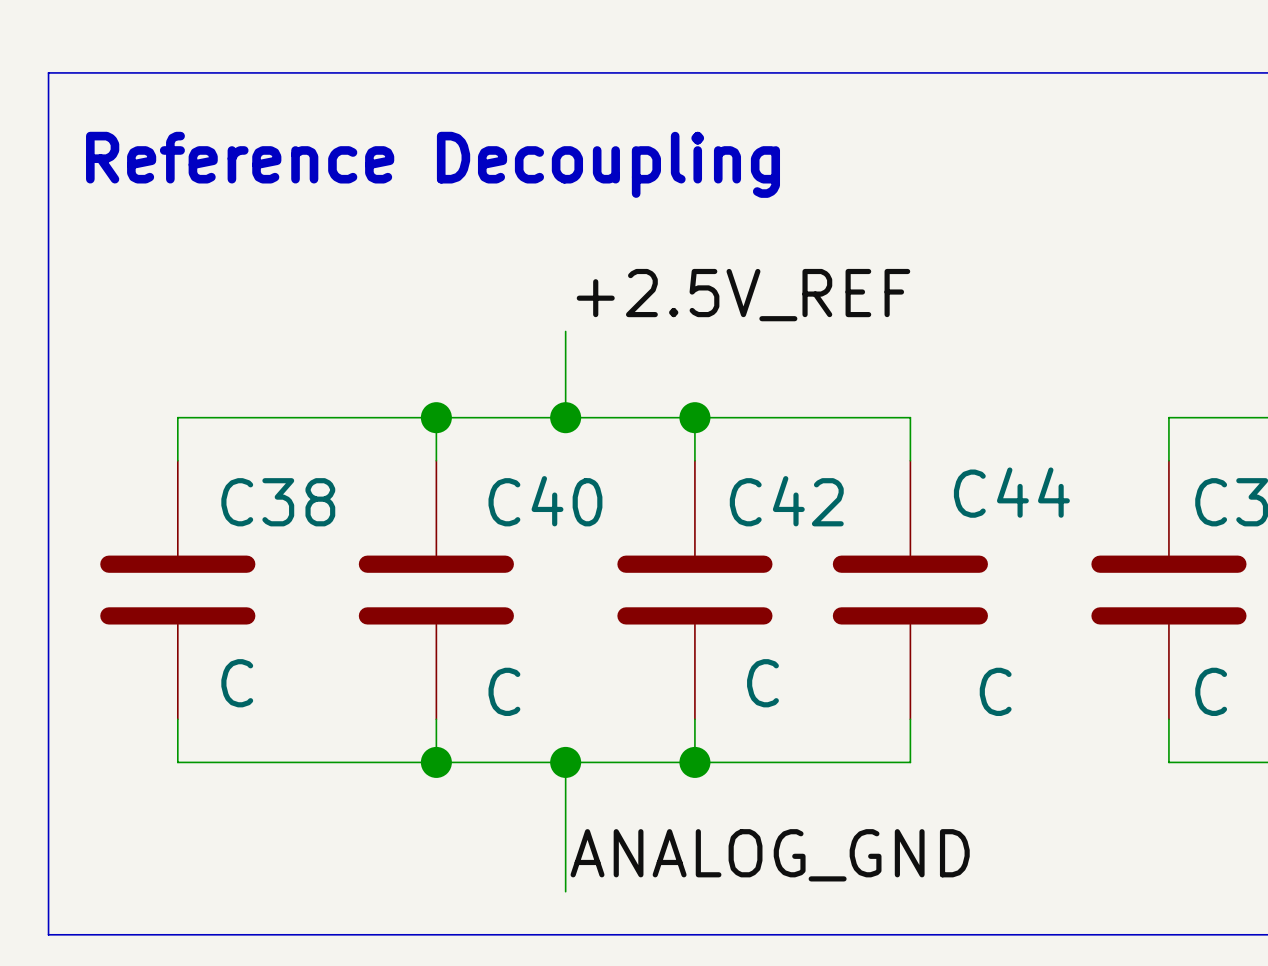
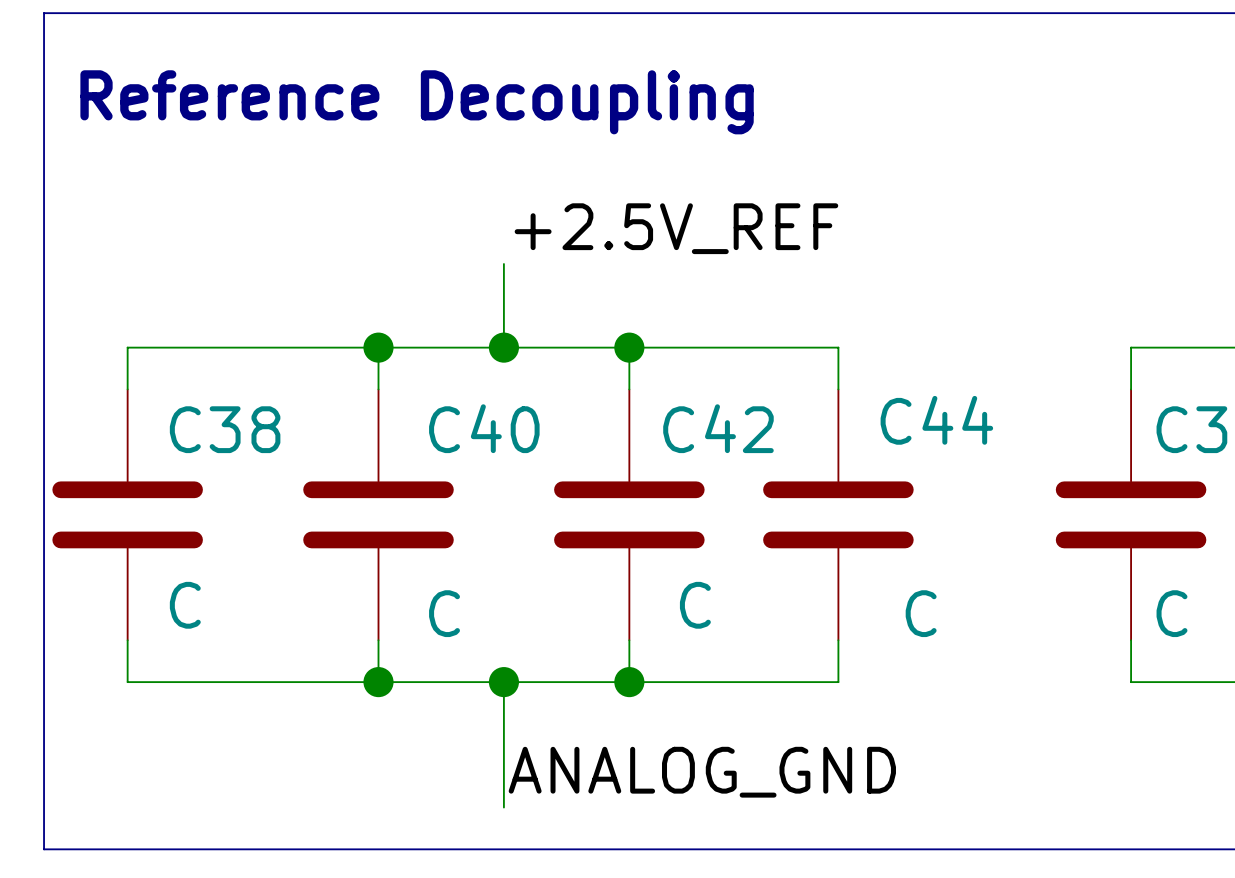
label position: +2.5V_REF (743, 295) -> +2.5V_REF (676, 228)
wire: (565, 331) (565, 417) -> (503, 264) (503, 347)
wire: (177, 417) (177, 460) -> (169, 347) (127, 347) (127, 389)
junction: none -> (378, 347)
wire: (436, 417) (436, 460) -> (378, 347) (378, 389)
junction: (436, 417) -> none
junction: none -> (503, 347)
junction: (565, 417) -> none
junction: none -> (629, 347)
wire: (694, 417) (694, 460) -> (629, 347) (629, 389)
junction: (694, 417) -> none
wire: (867, 417) (910, 417) (910, 460) -> (838, 347) (838, 389)
C38 position: (177, 590) -> (127, 514)
C40 position: (436, 590) -> (378, 514)
C42 position: (694, 590) -> (629, 514)
C44 position: (910, 590) -> (838, 514)
wire: (177, 719) (177, 762) -> (127, 640) (127, 682) (169, 682)
wire: (436, 719) (436, 762) -> (378, 640) (378, 682)
wire: (694, 719) (694, 762) -> (629, 640) (629, 682)
wire: (910, 719) (910, 762) (867, 762) -> (838, 640) (838, 682)
junction: none -> (378, 682)
junction: (436, 762) -> none
junction: none -> (503, 682)
wire: (565, 762) (565, 891) -> (503, 682) (503, 807)
junction: (565, 762) -> none
junction: none -> (629, 682)
junction: (694, 762) -> none
label position: ANALOG_GND (770, 855) -> ANALOG_GND (702, 772)

